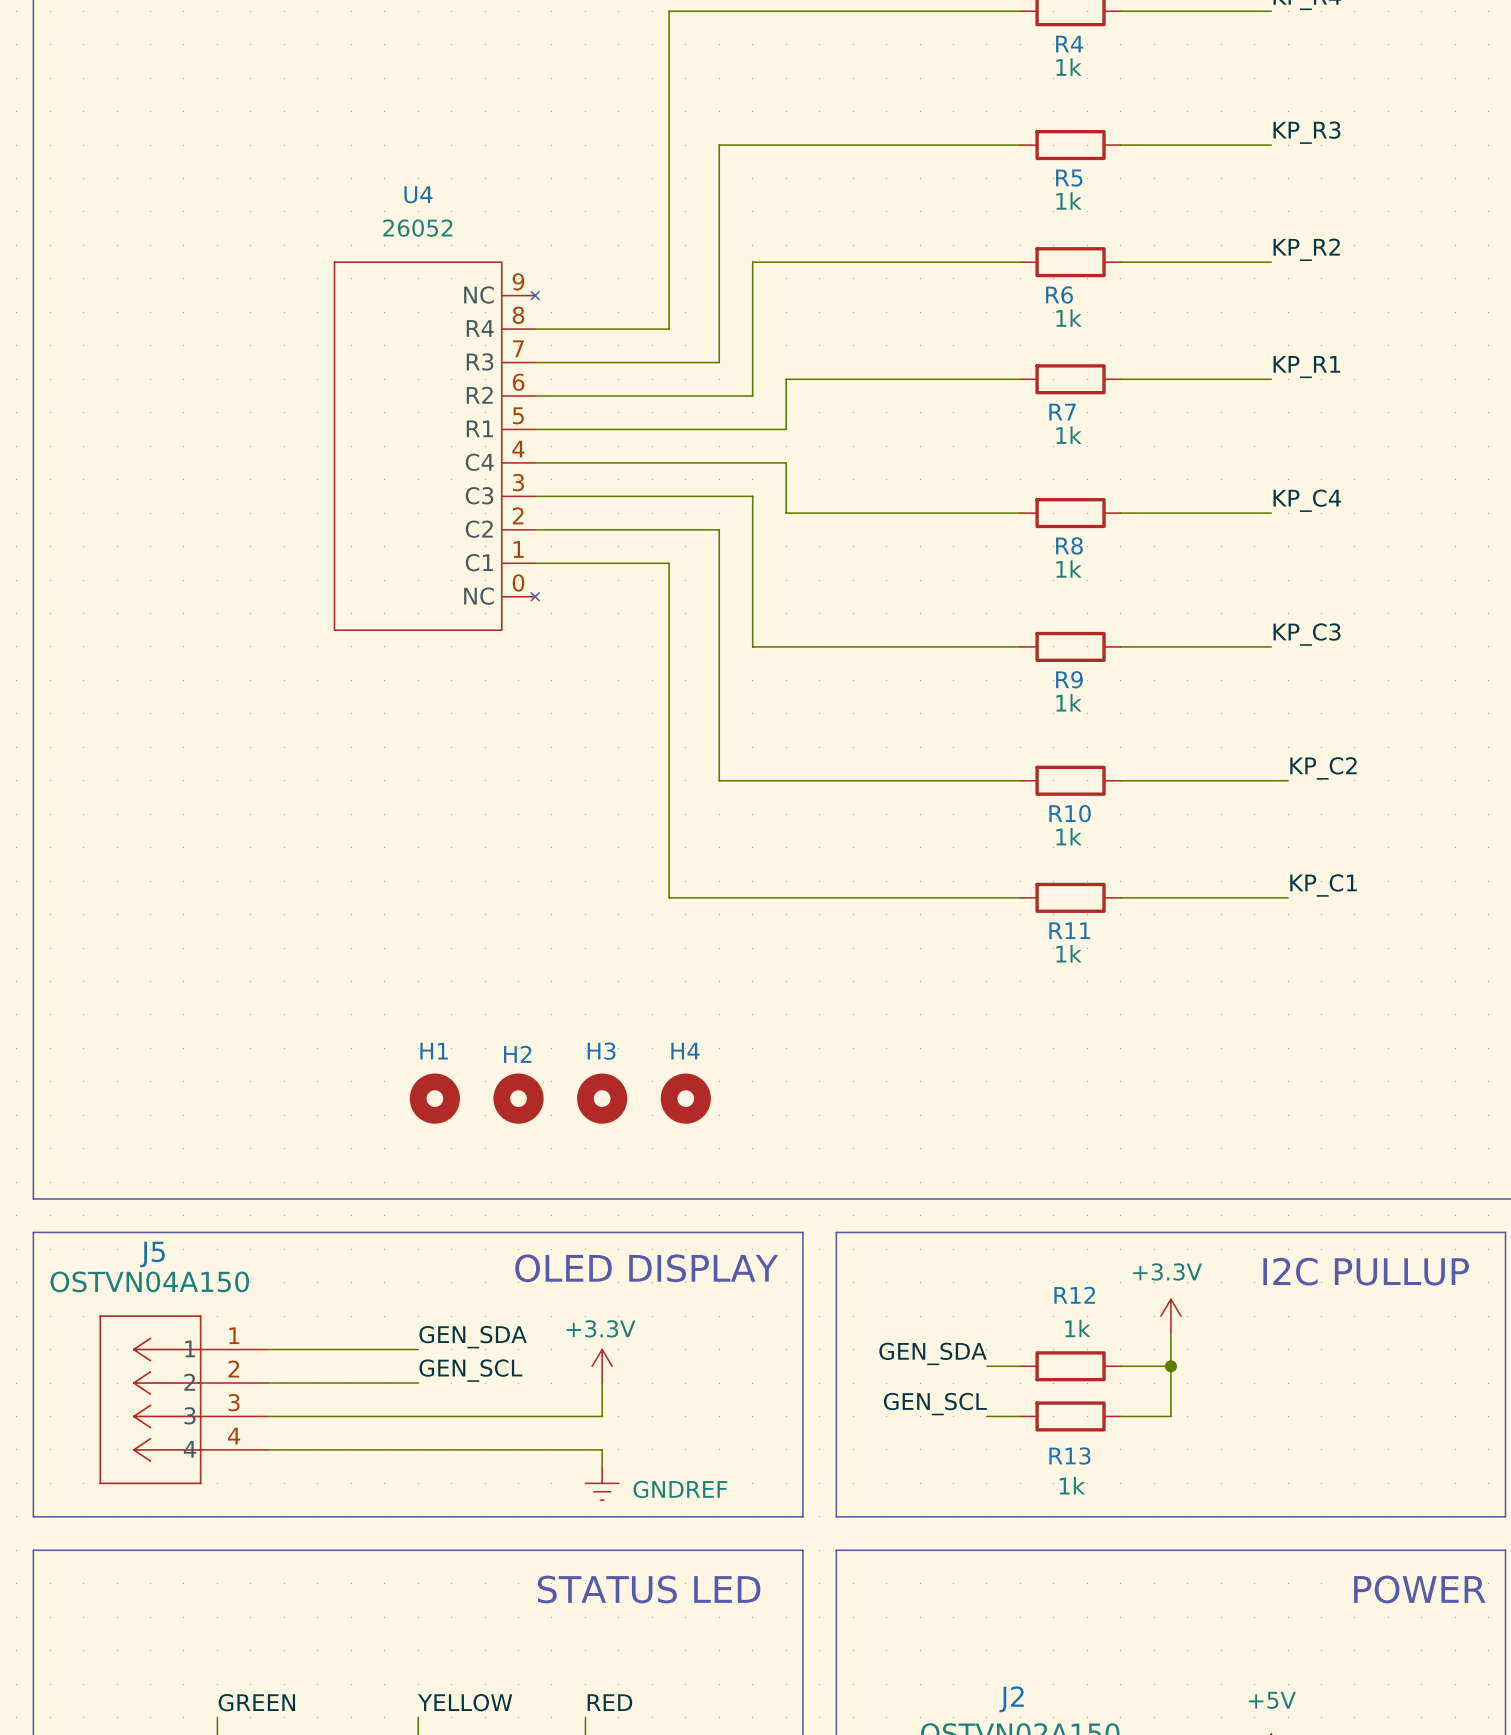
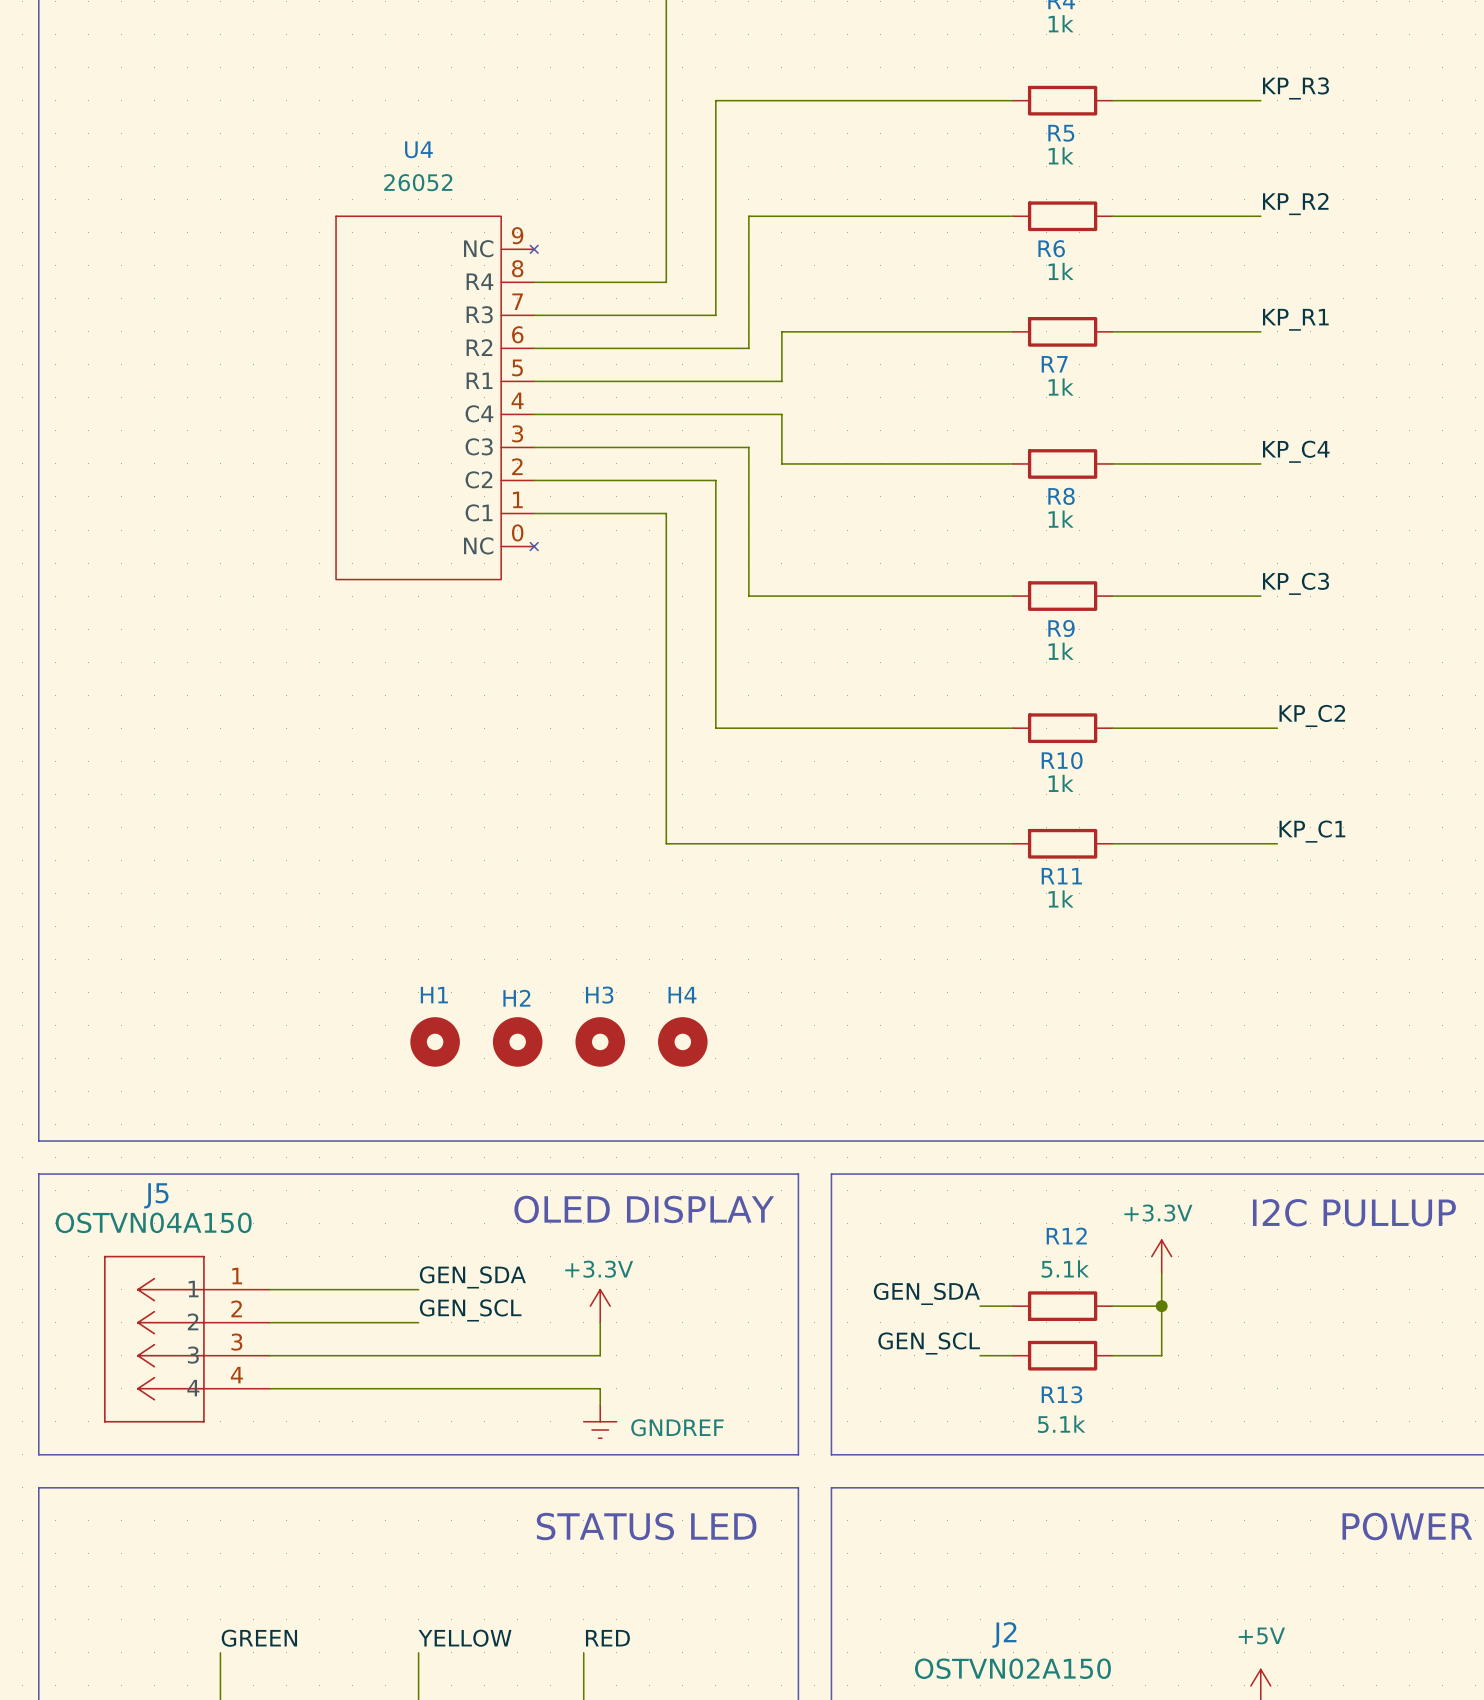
R12 value: 1k (1077, 1328) -> 5.1k (1065, 1269)
R13 value: 1k (1072, 1485) -> 5.1k (1061, 1424)

